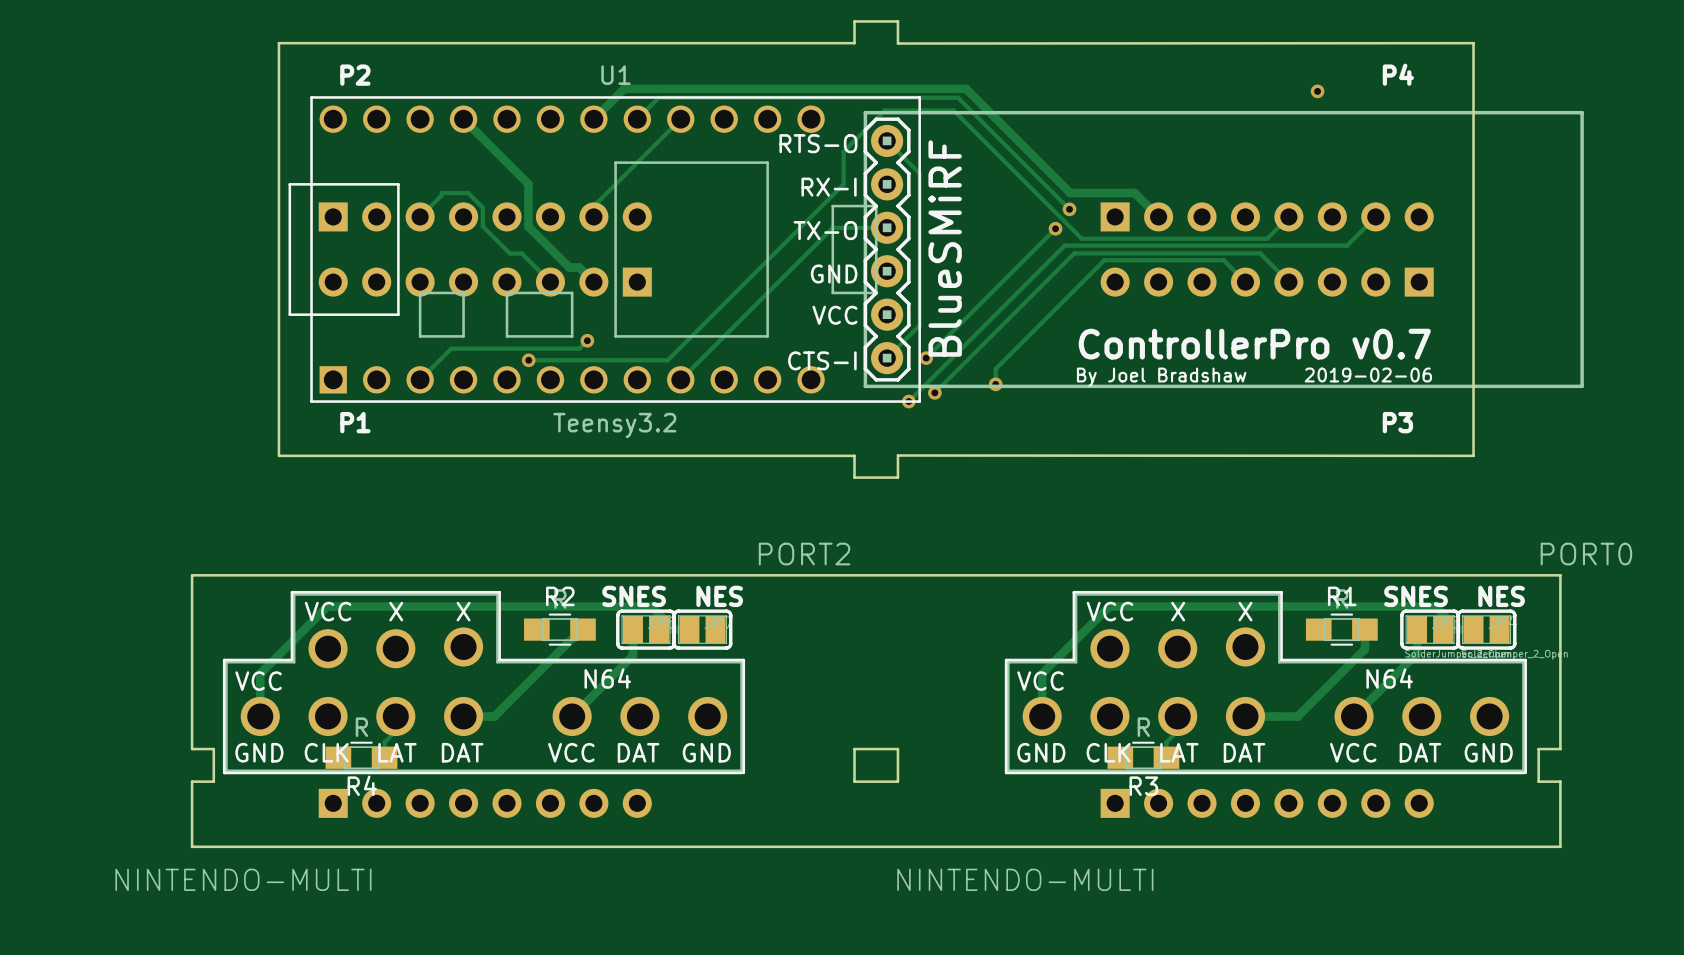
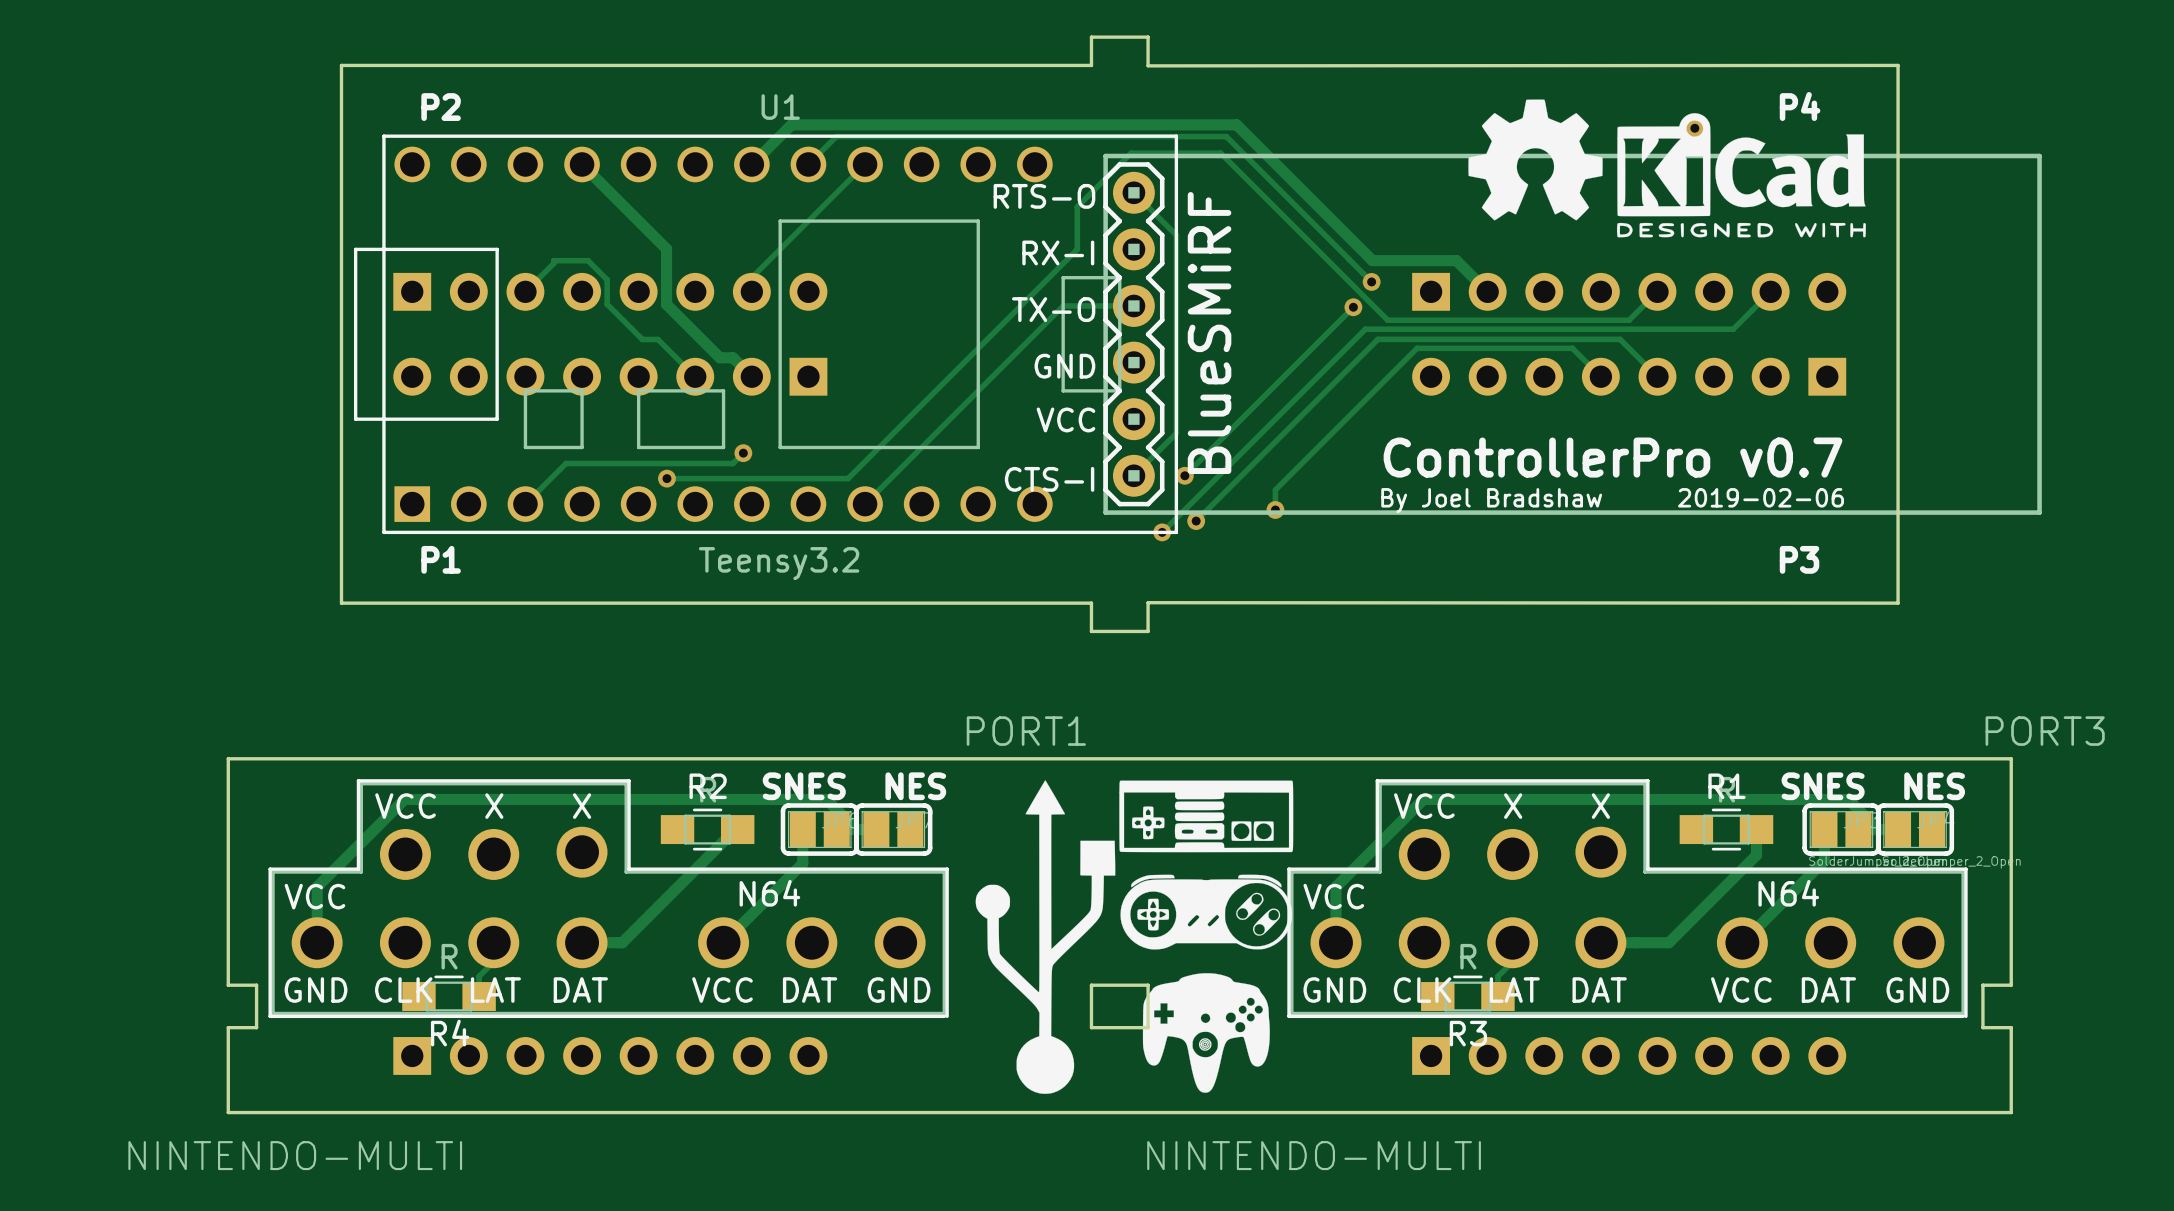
drawing: none -> [1468, 99, 1866, 238]
PORT2 name: PORT2 (804, 554) -> PORT1 (1026, 731)
PORT0 name: PORT0 (1586, 554) -> PORT3 (2045, 731)
drawing: none -> [975, 780, 1294, 1094]

